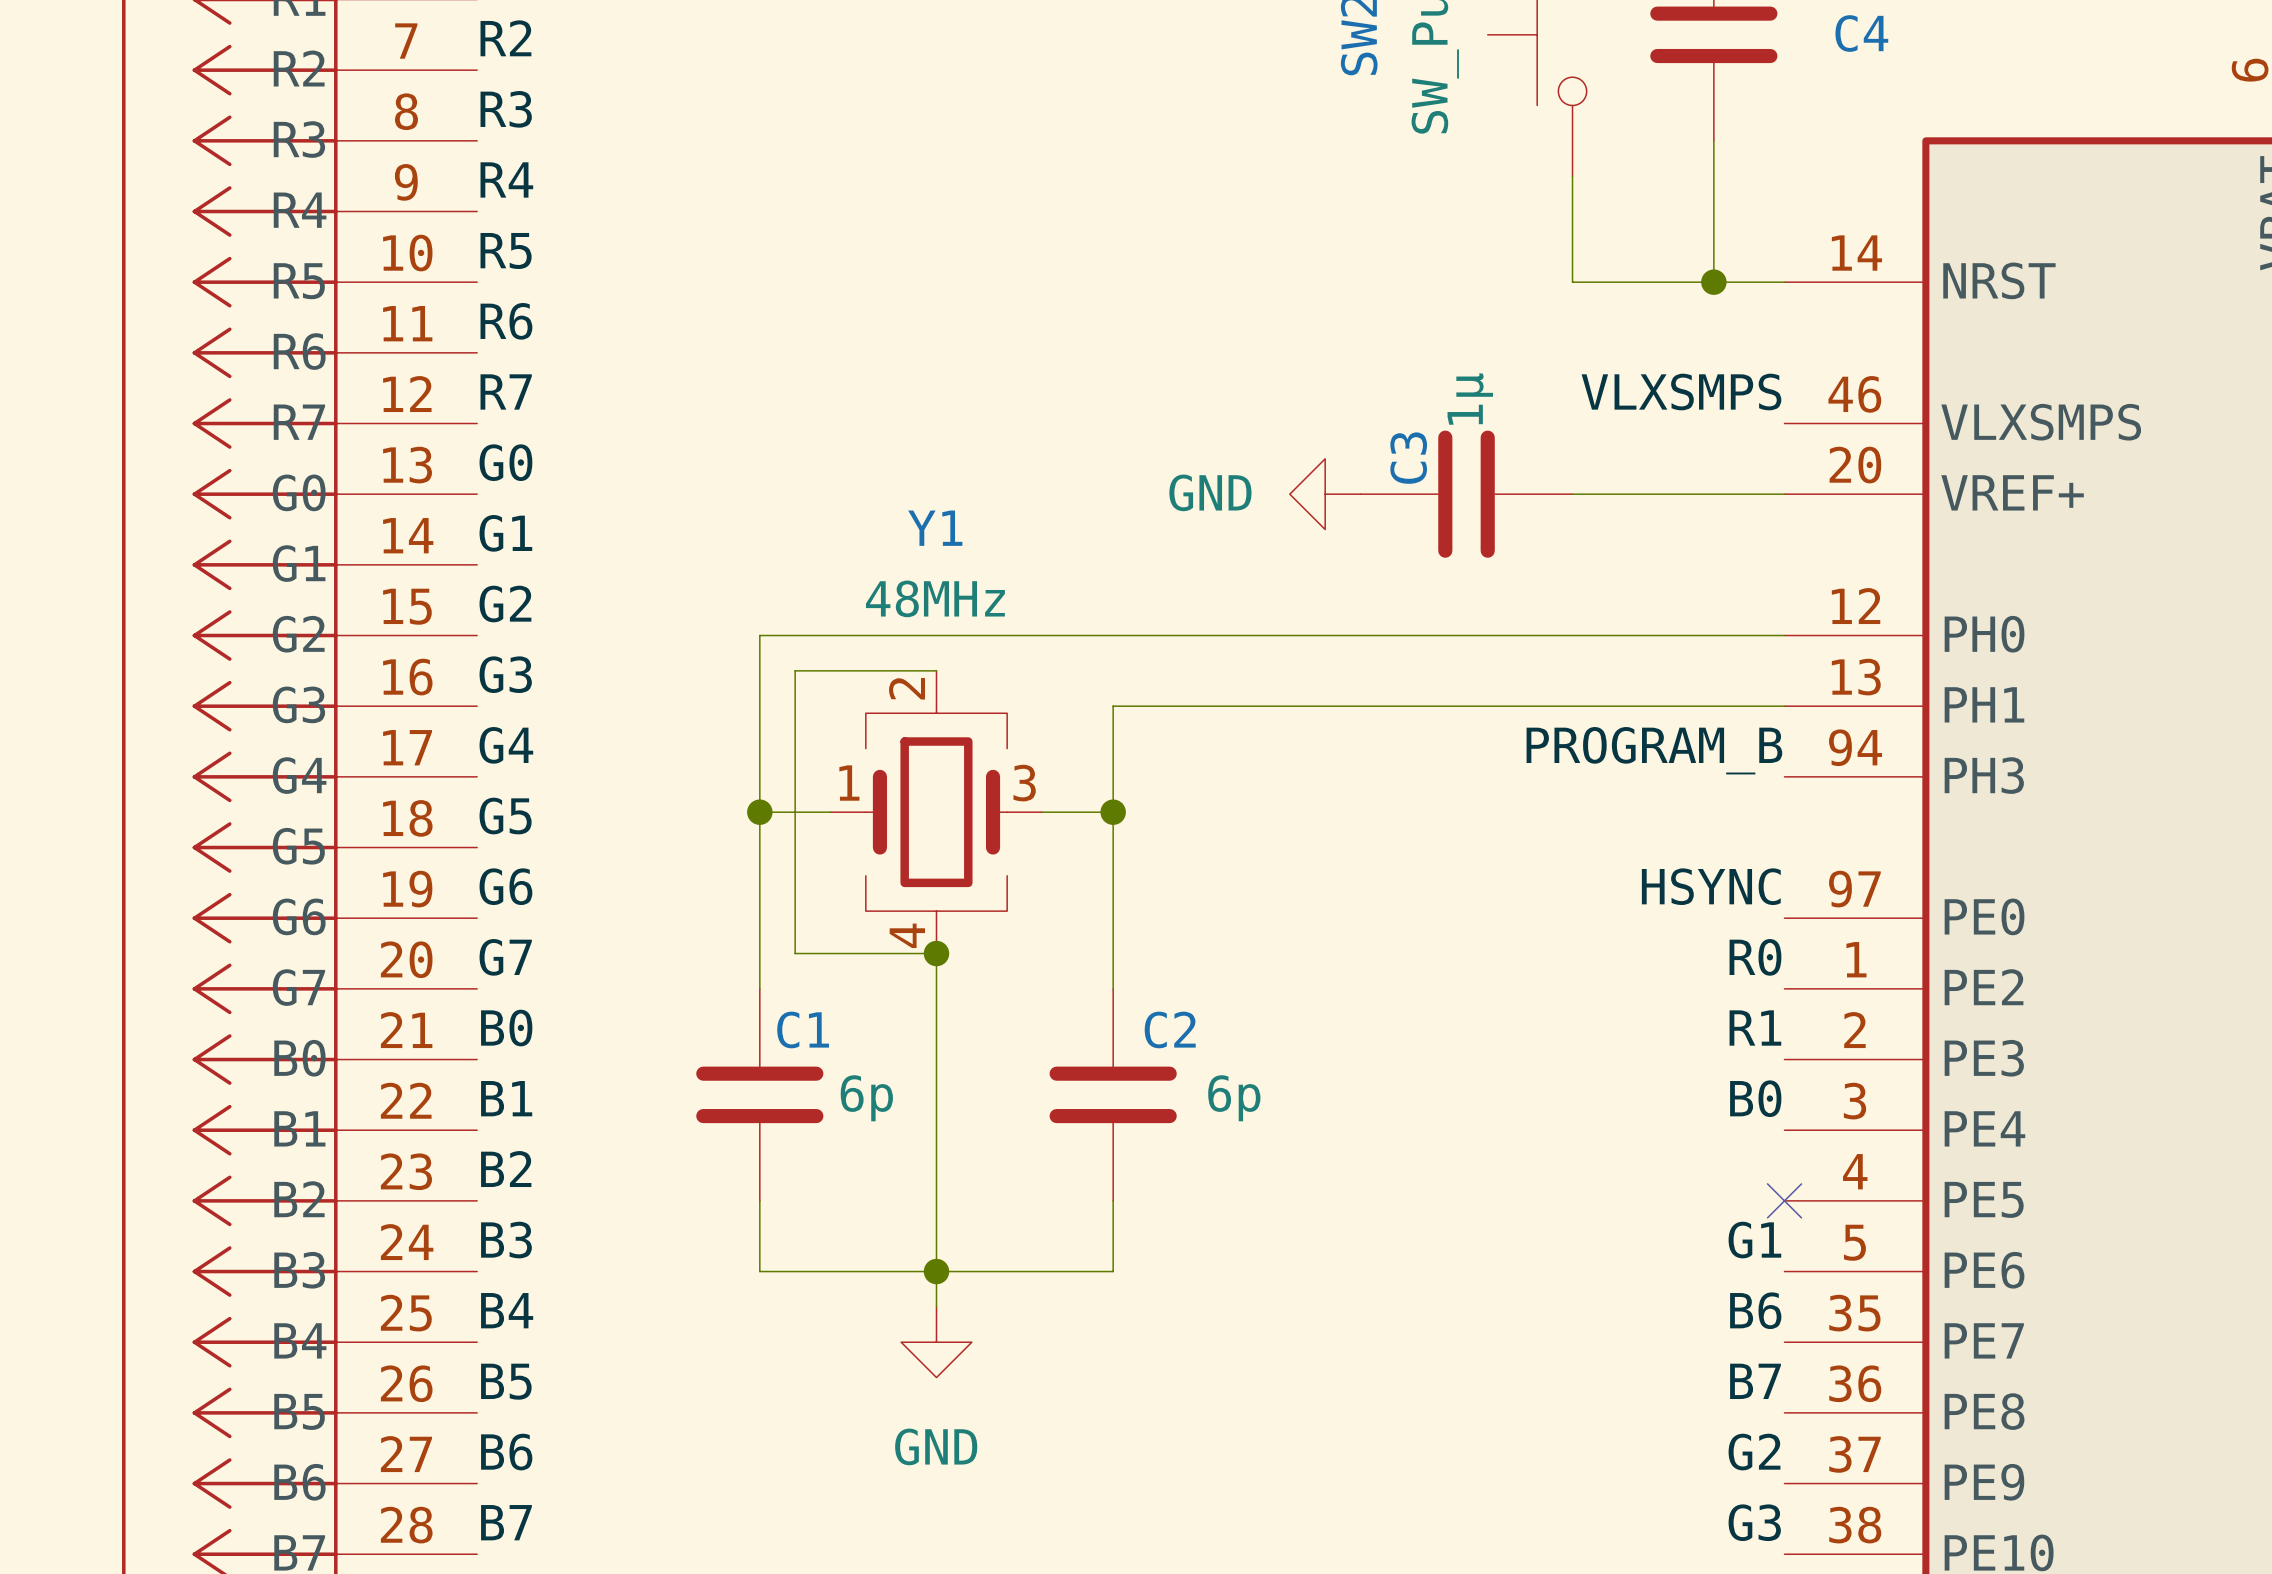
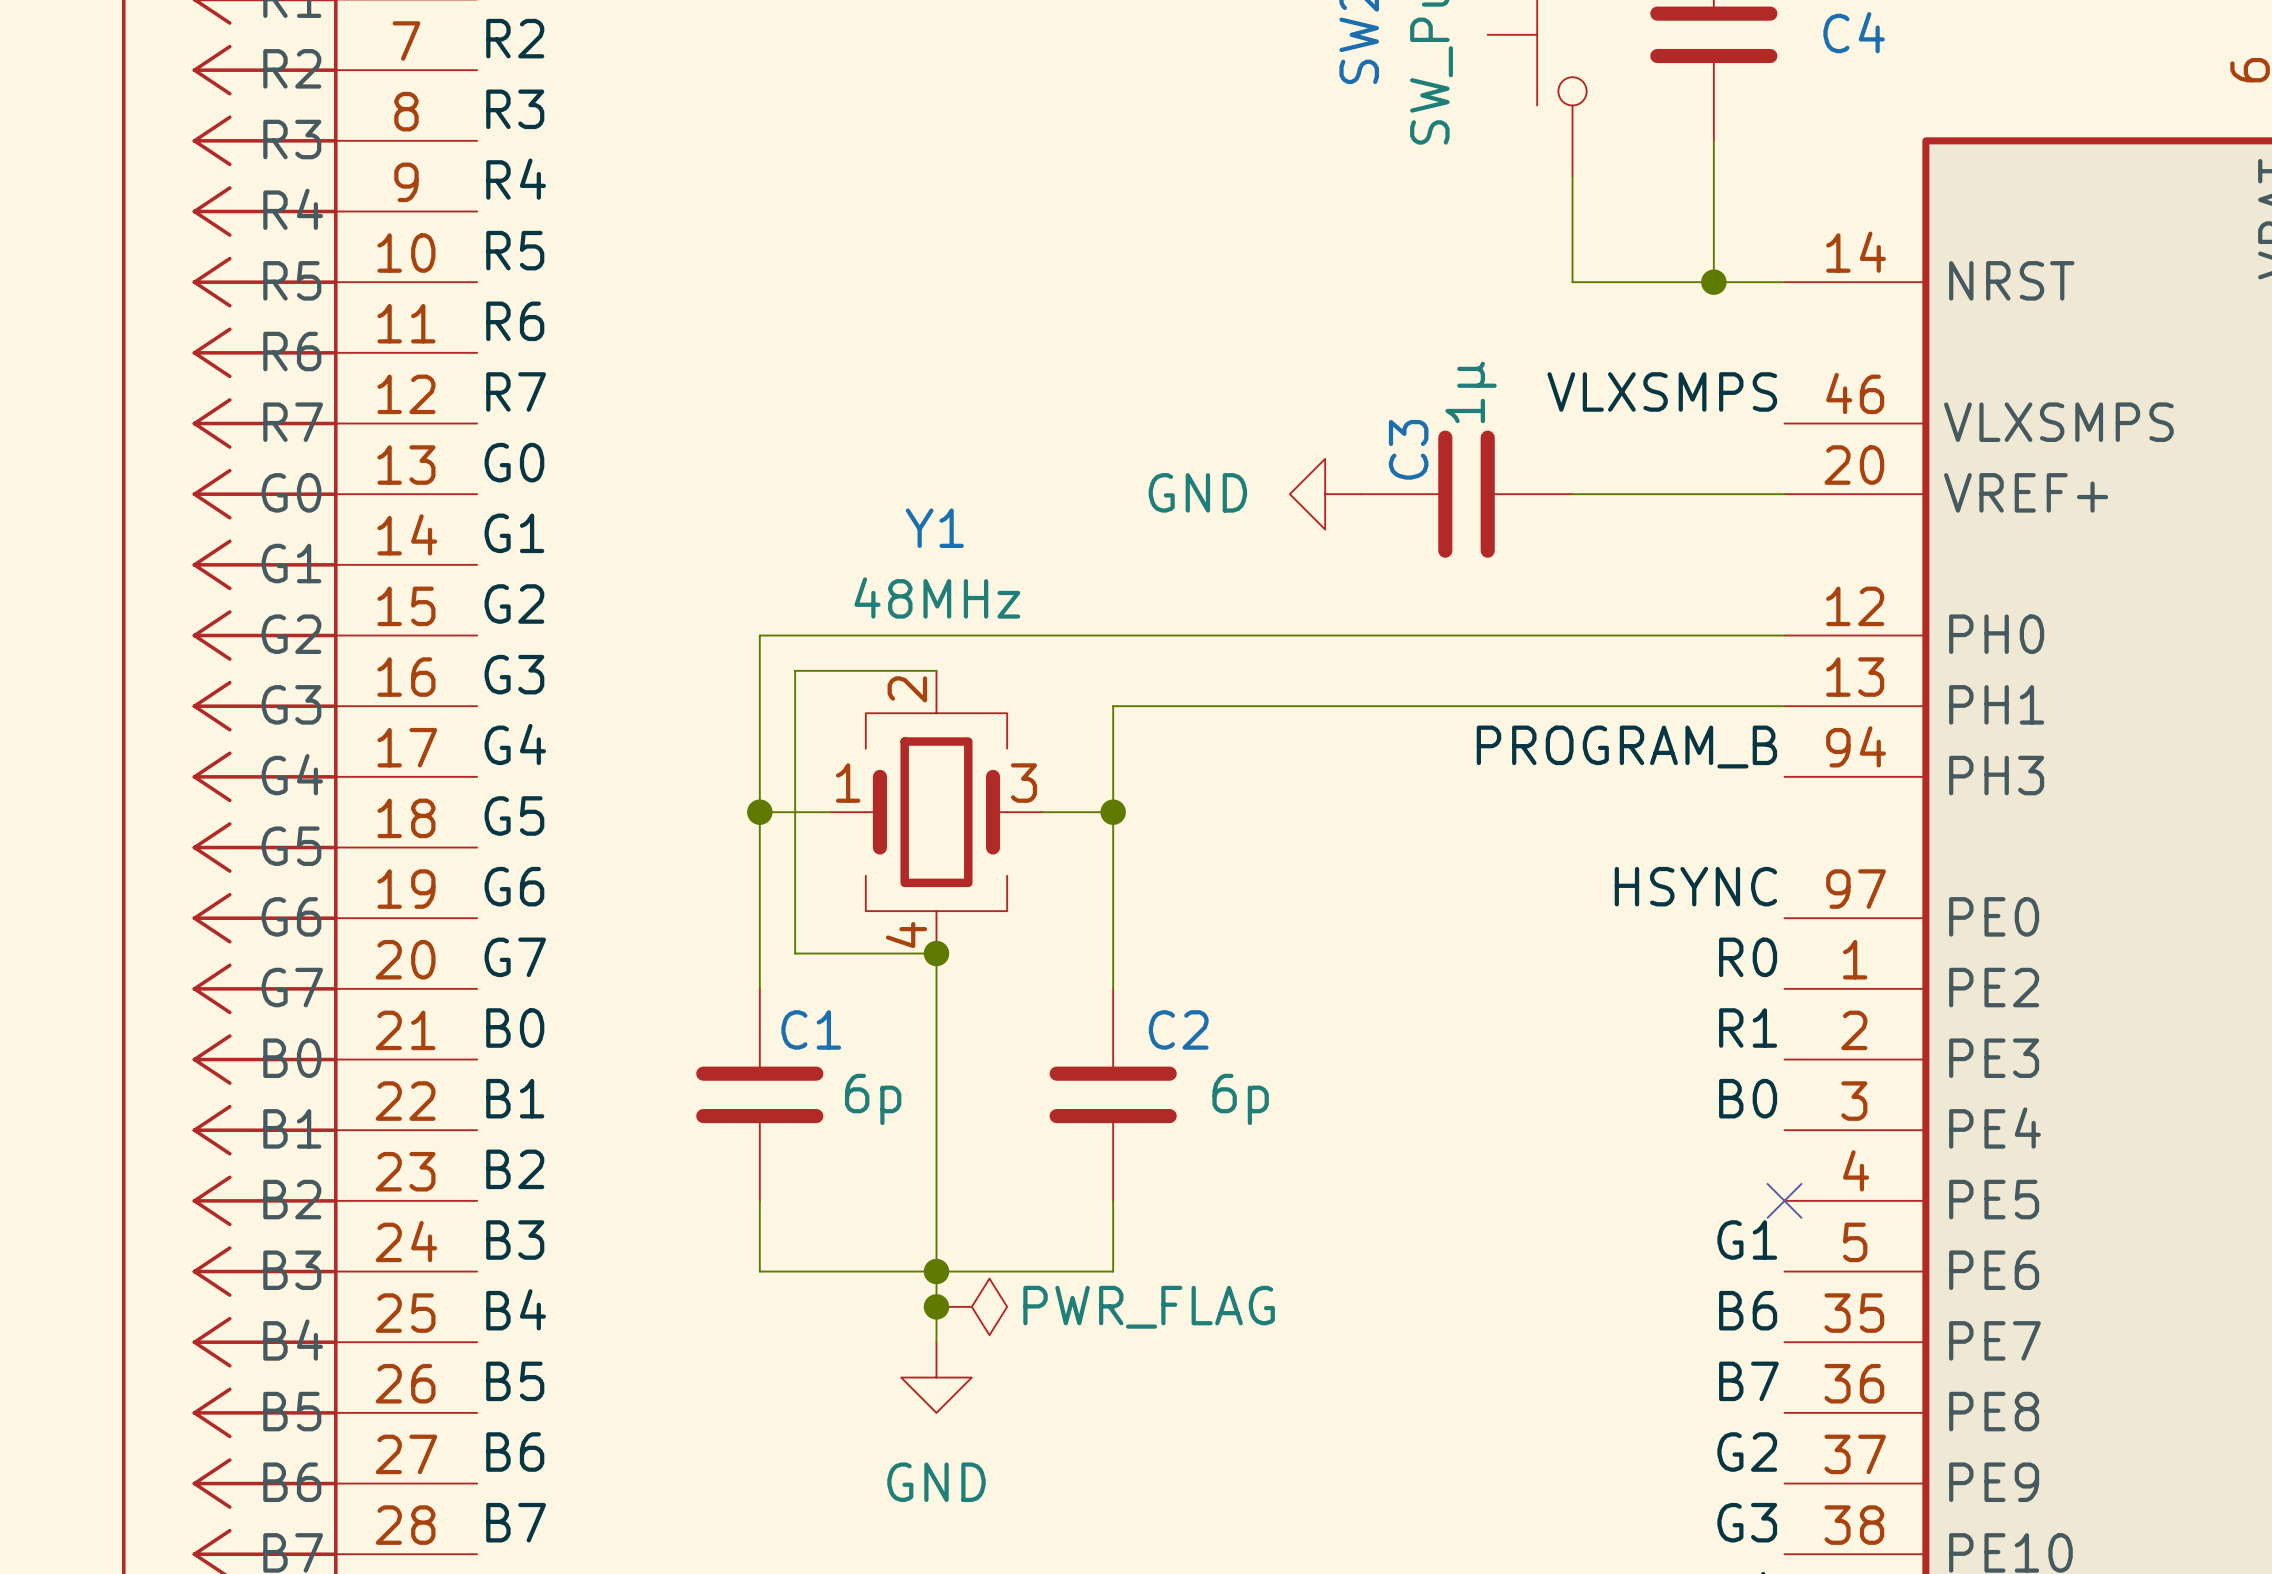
junction: none -> (936, 1306)
power symbol: none -> PWR_FLAG (971, 1306)
power symbol position: GND (936, 1342) -> GND (936, 1377)

